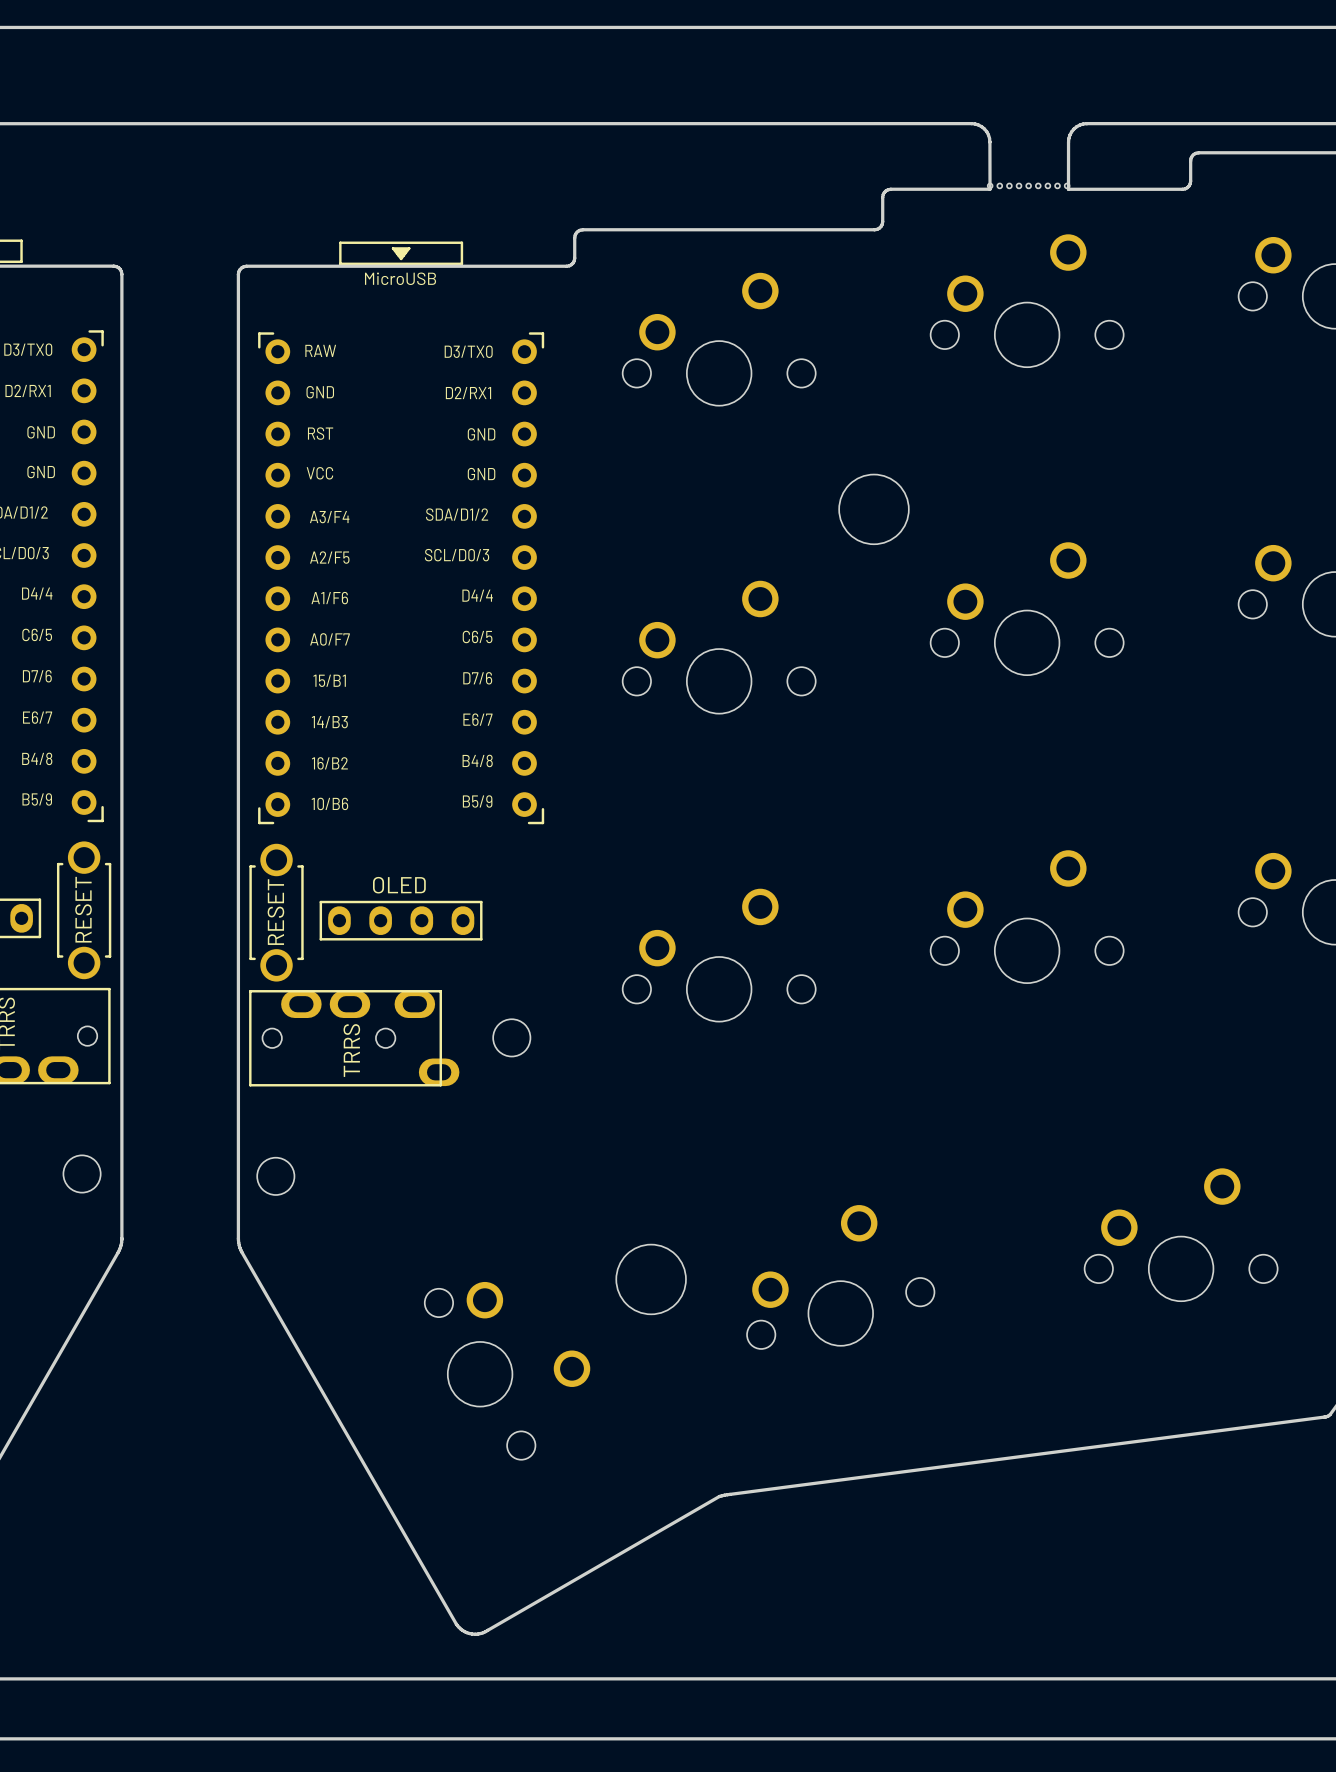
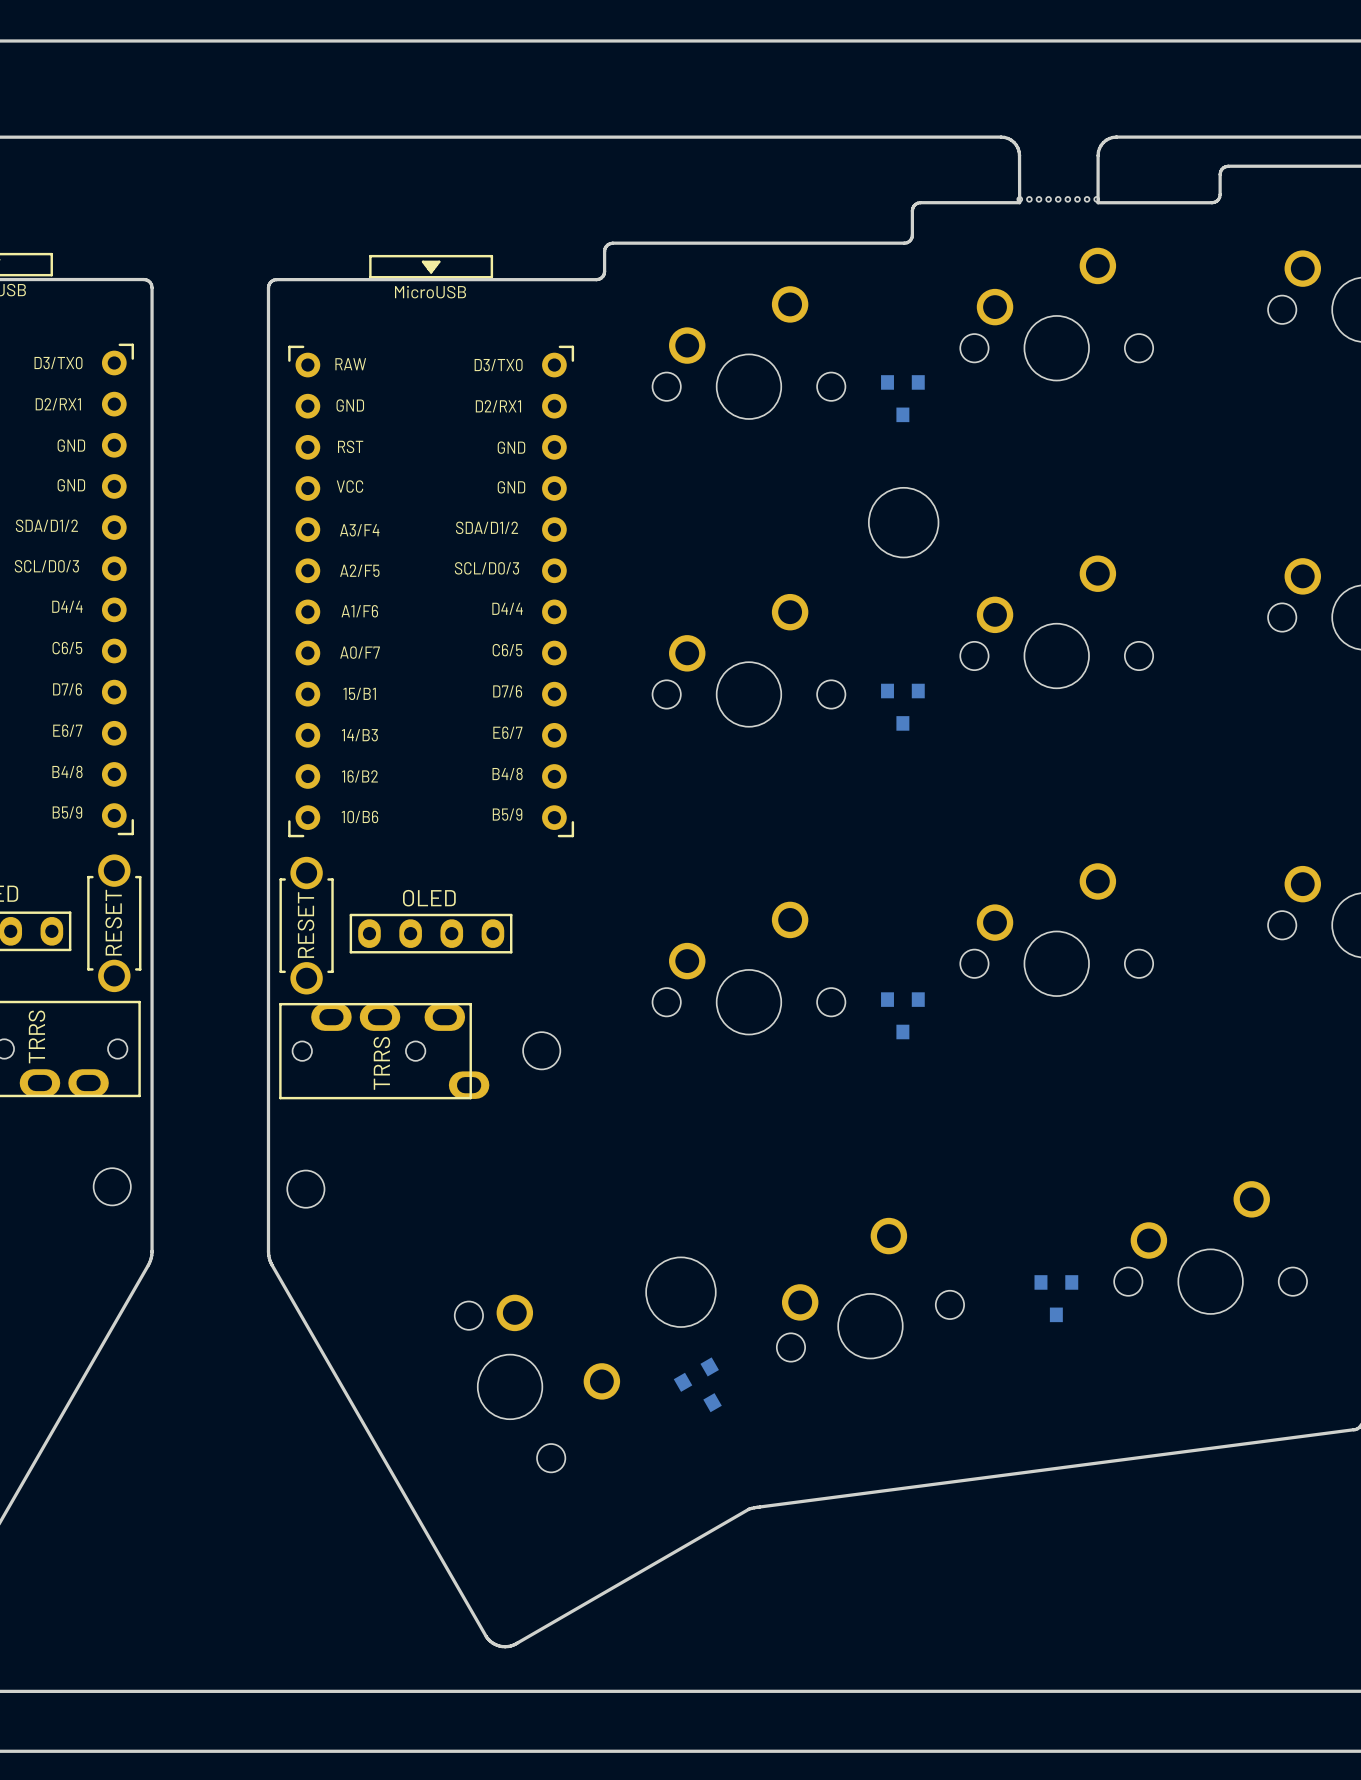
part: none -> (902, 398)
part: none -> (902, 707)
part: none -> (902, 1015)
part: none -> (1056, 1298)
part: none -> (697, 1384)

